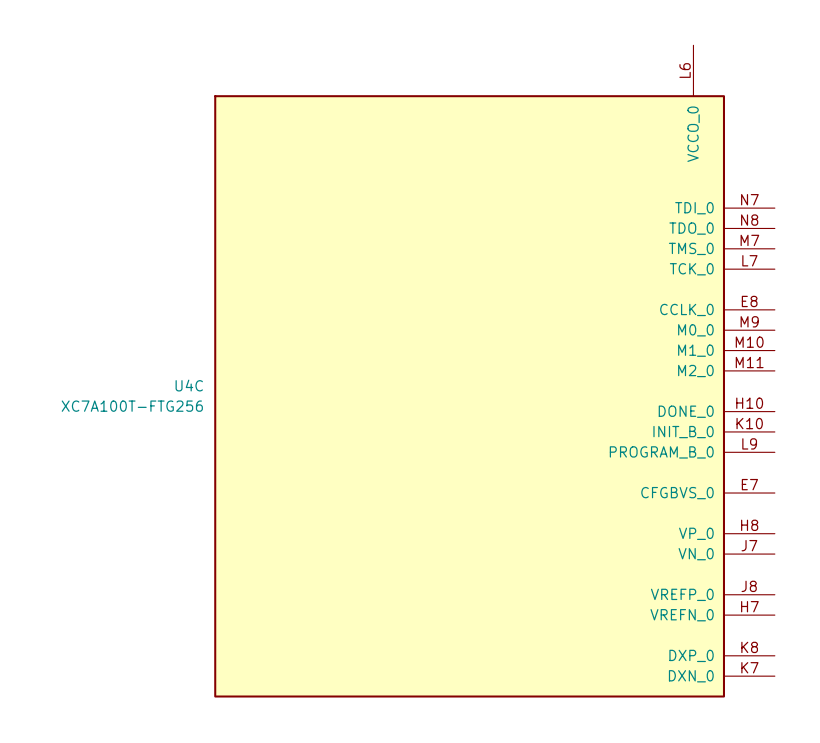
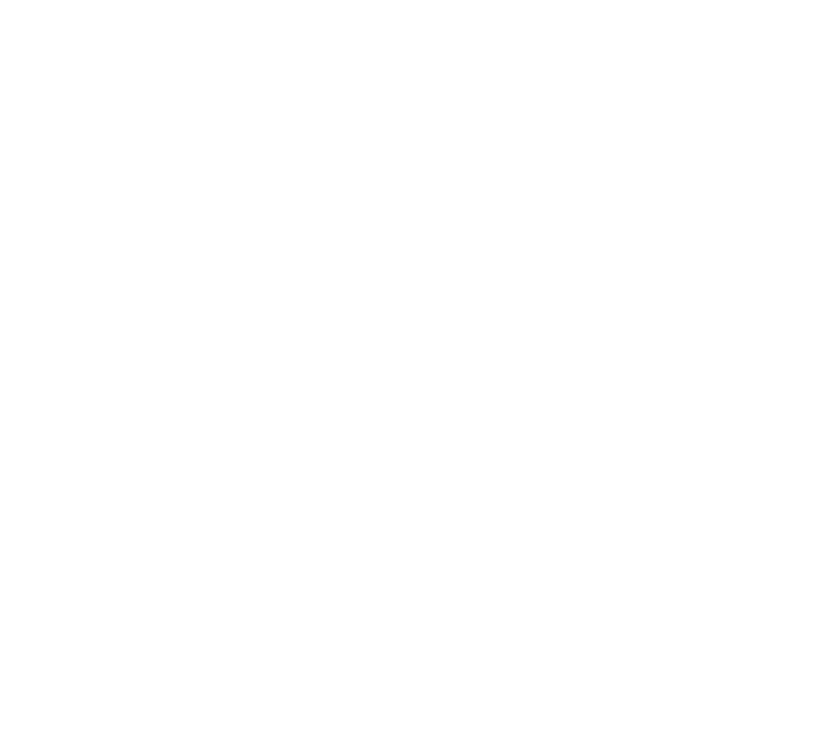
U4C: XC7A100T-FTG256 (494, 371) -> none

